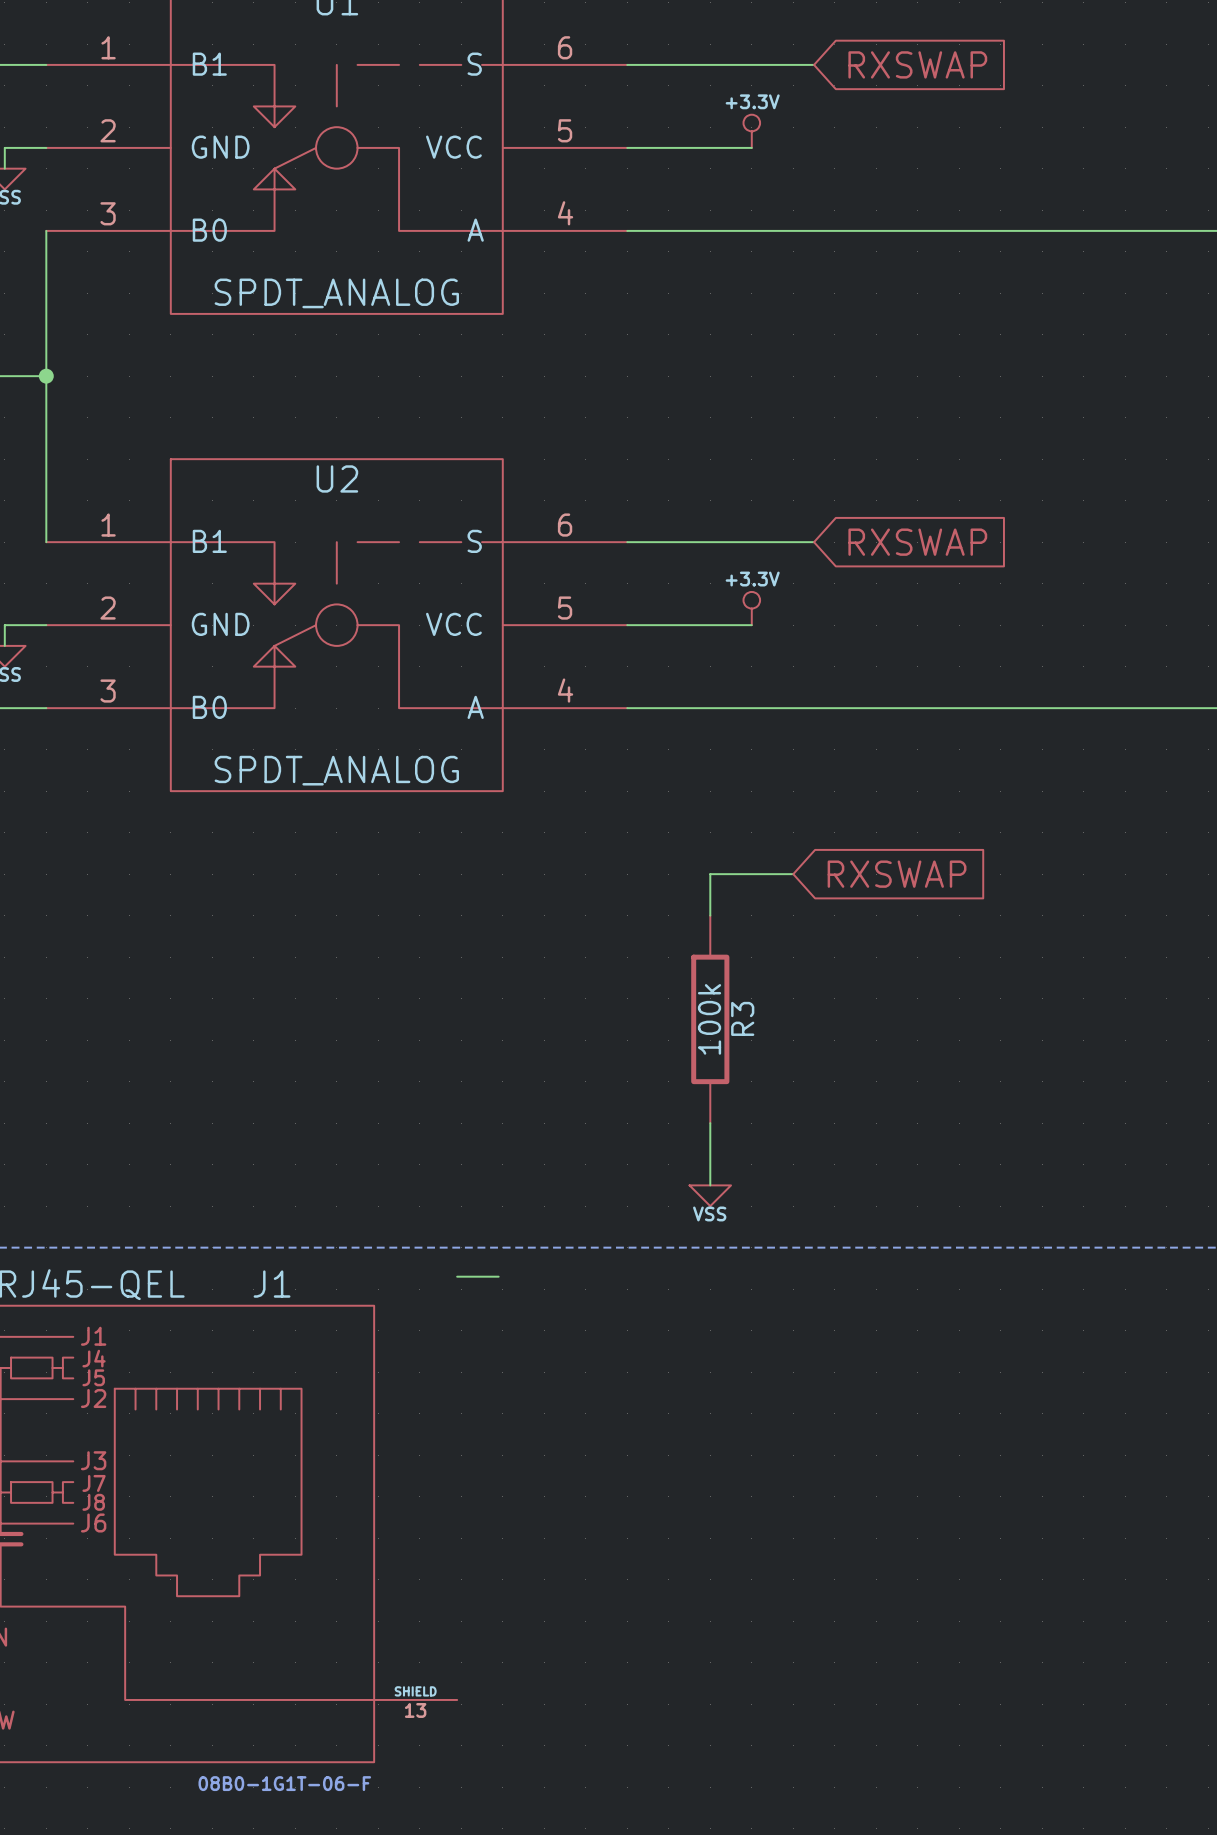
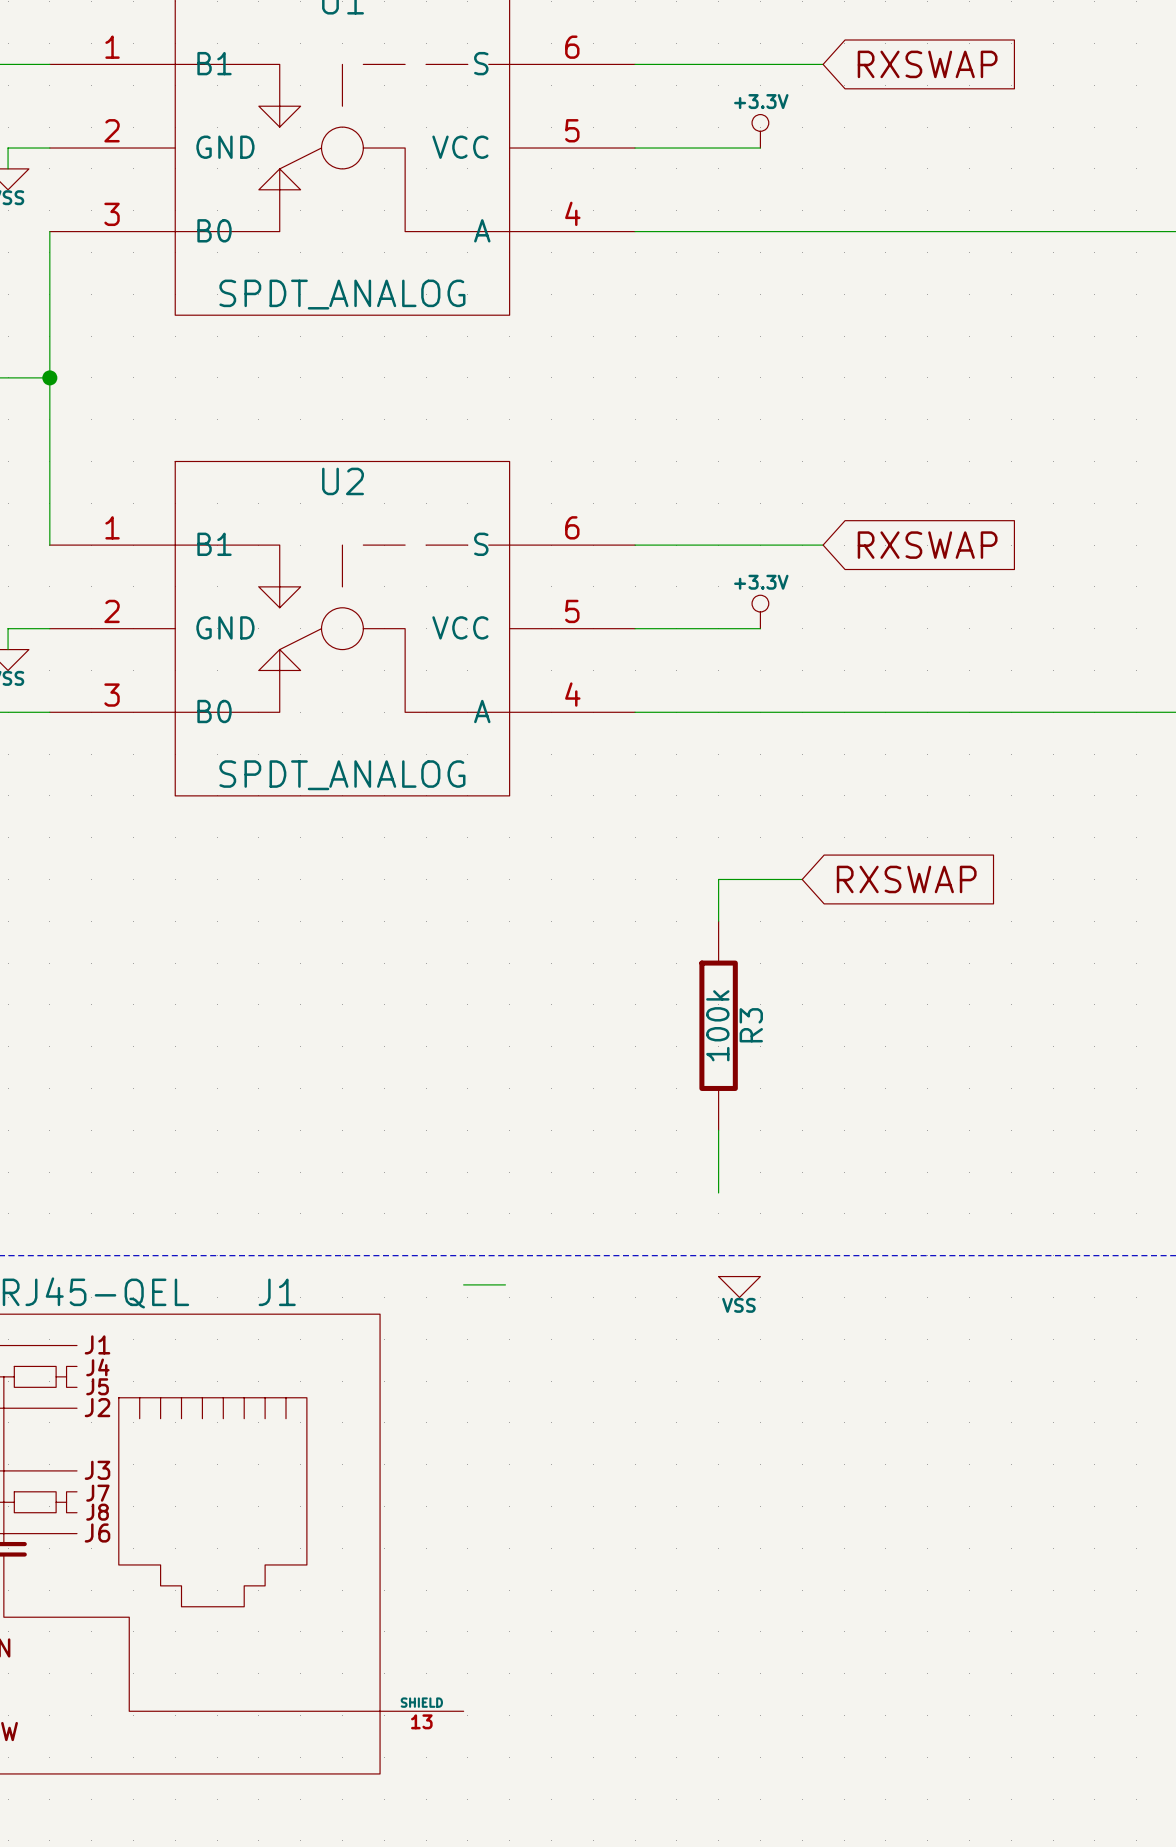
power symbol position: VSS (710, 1195) -> VSS (739, 1287)
text: 08B0-1G1T-06-F (284, 1783) -> none

